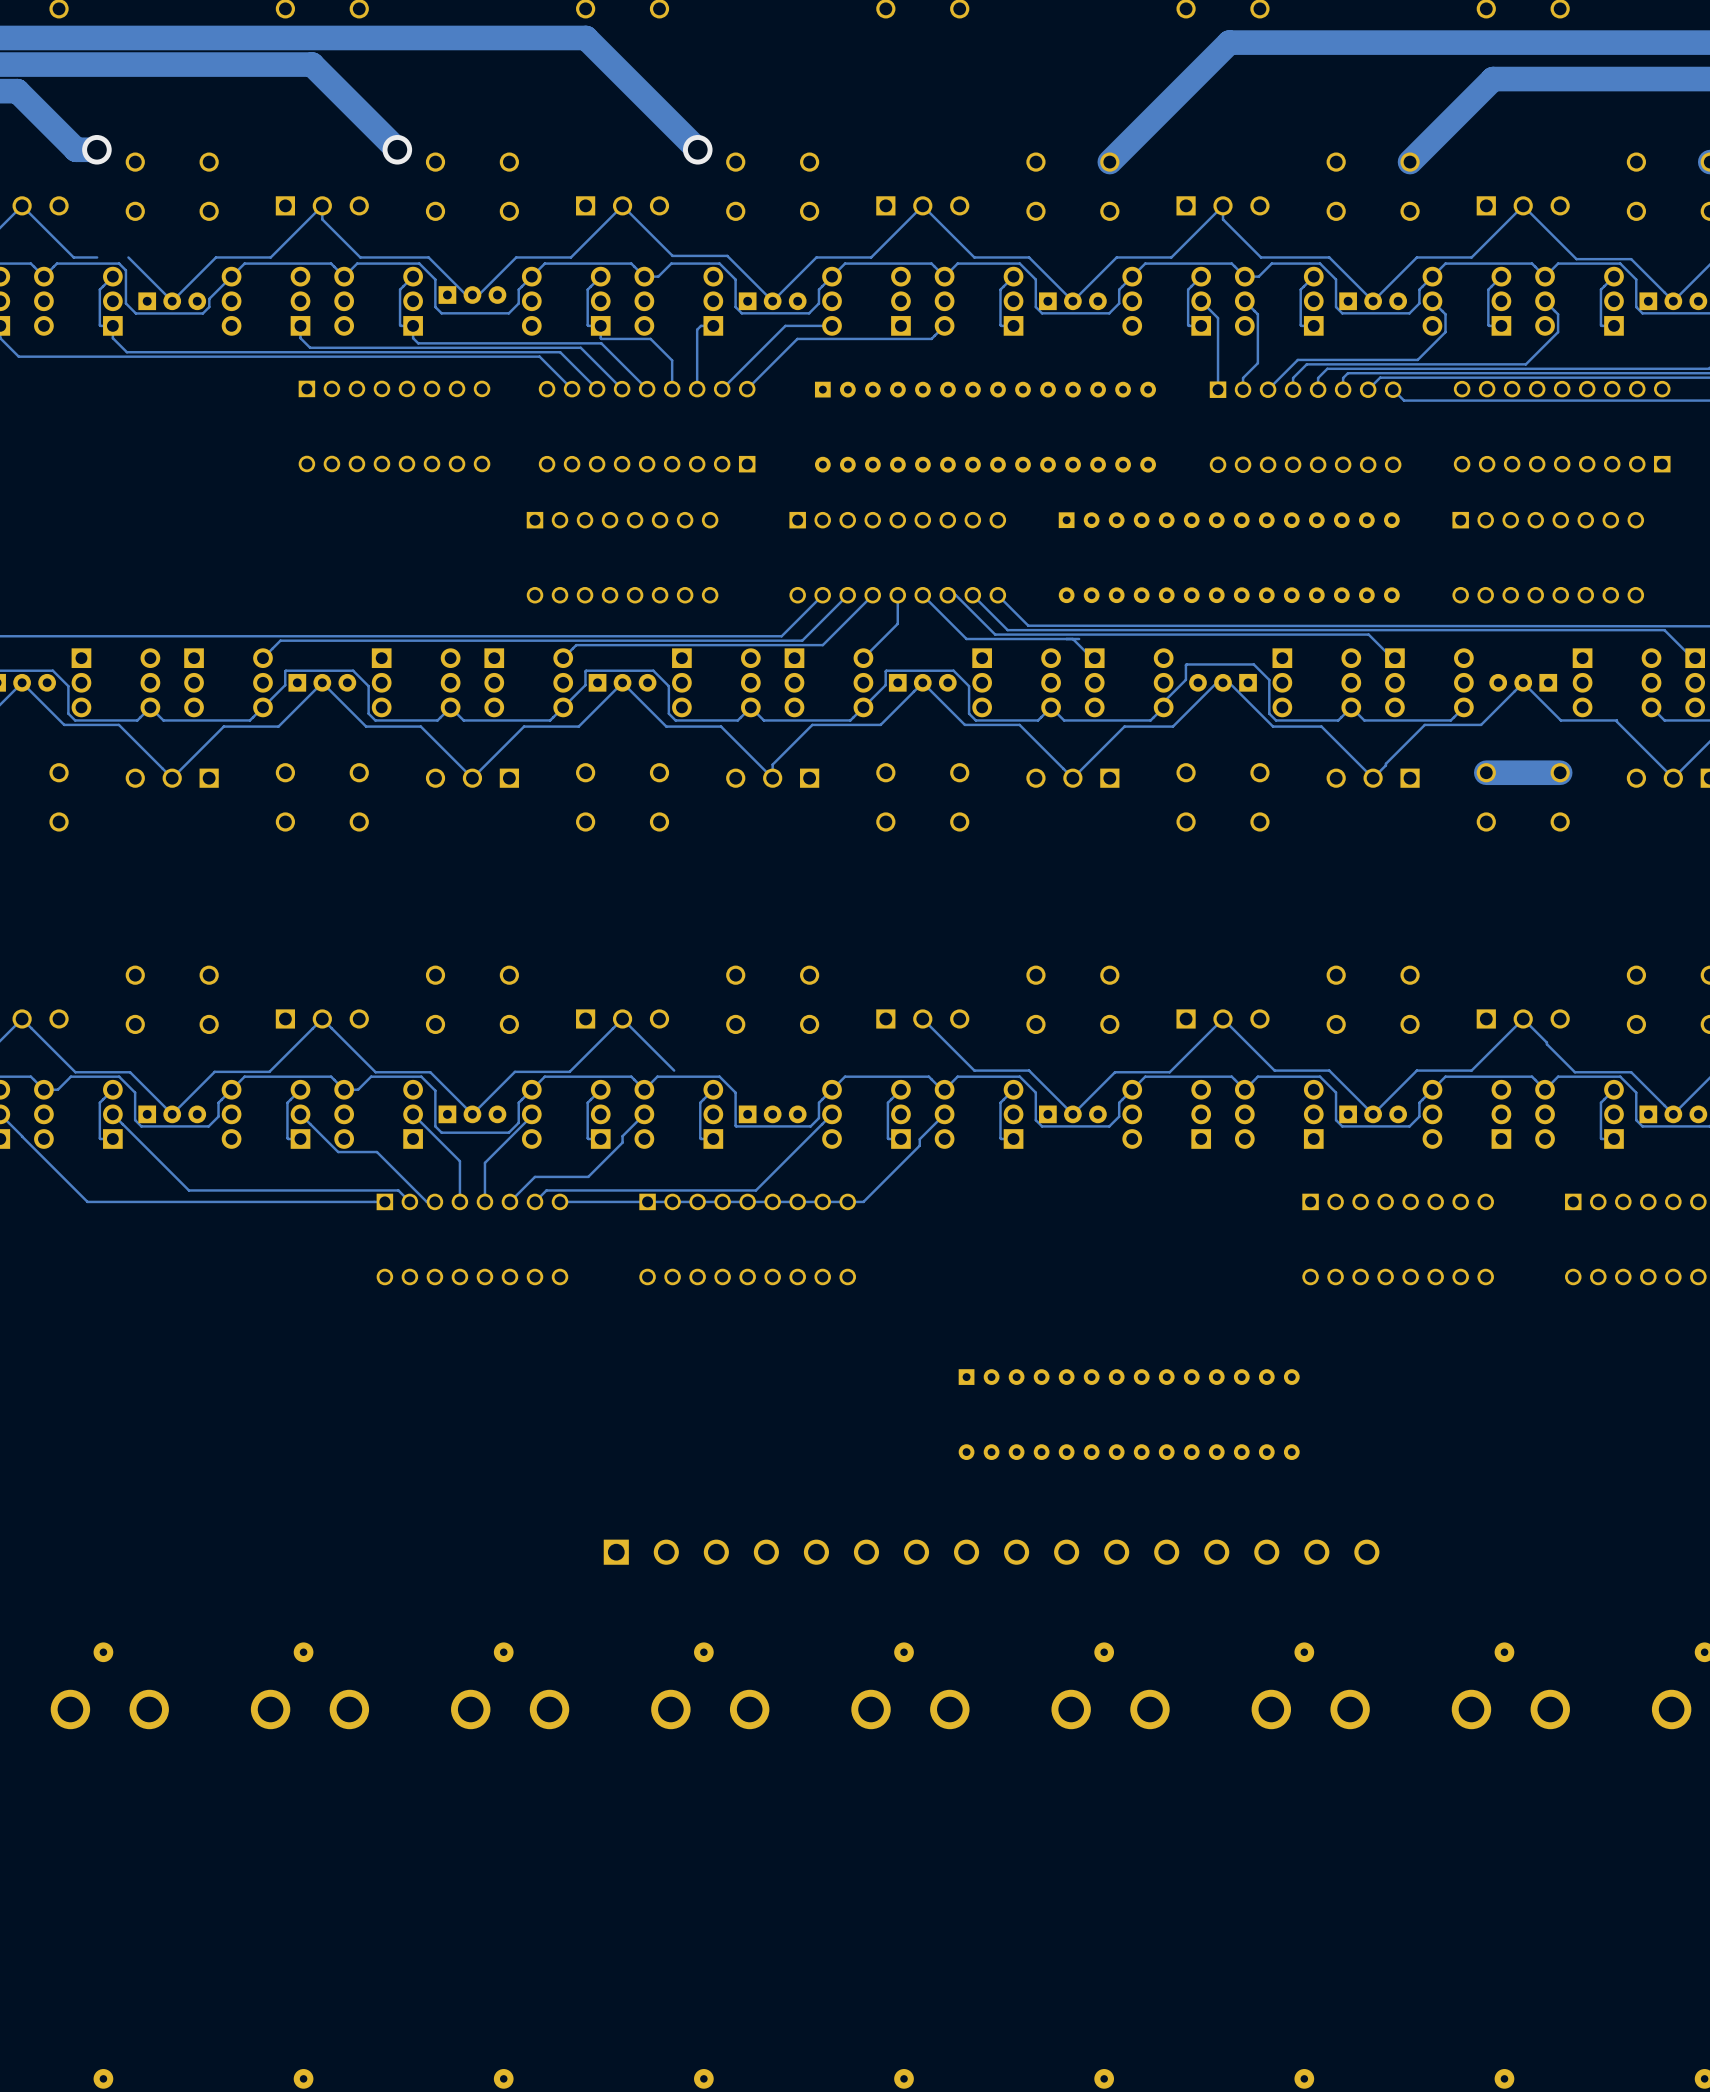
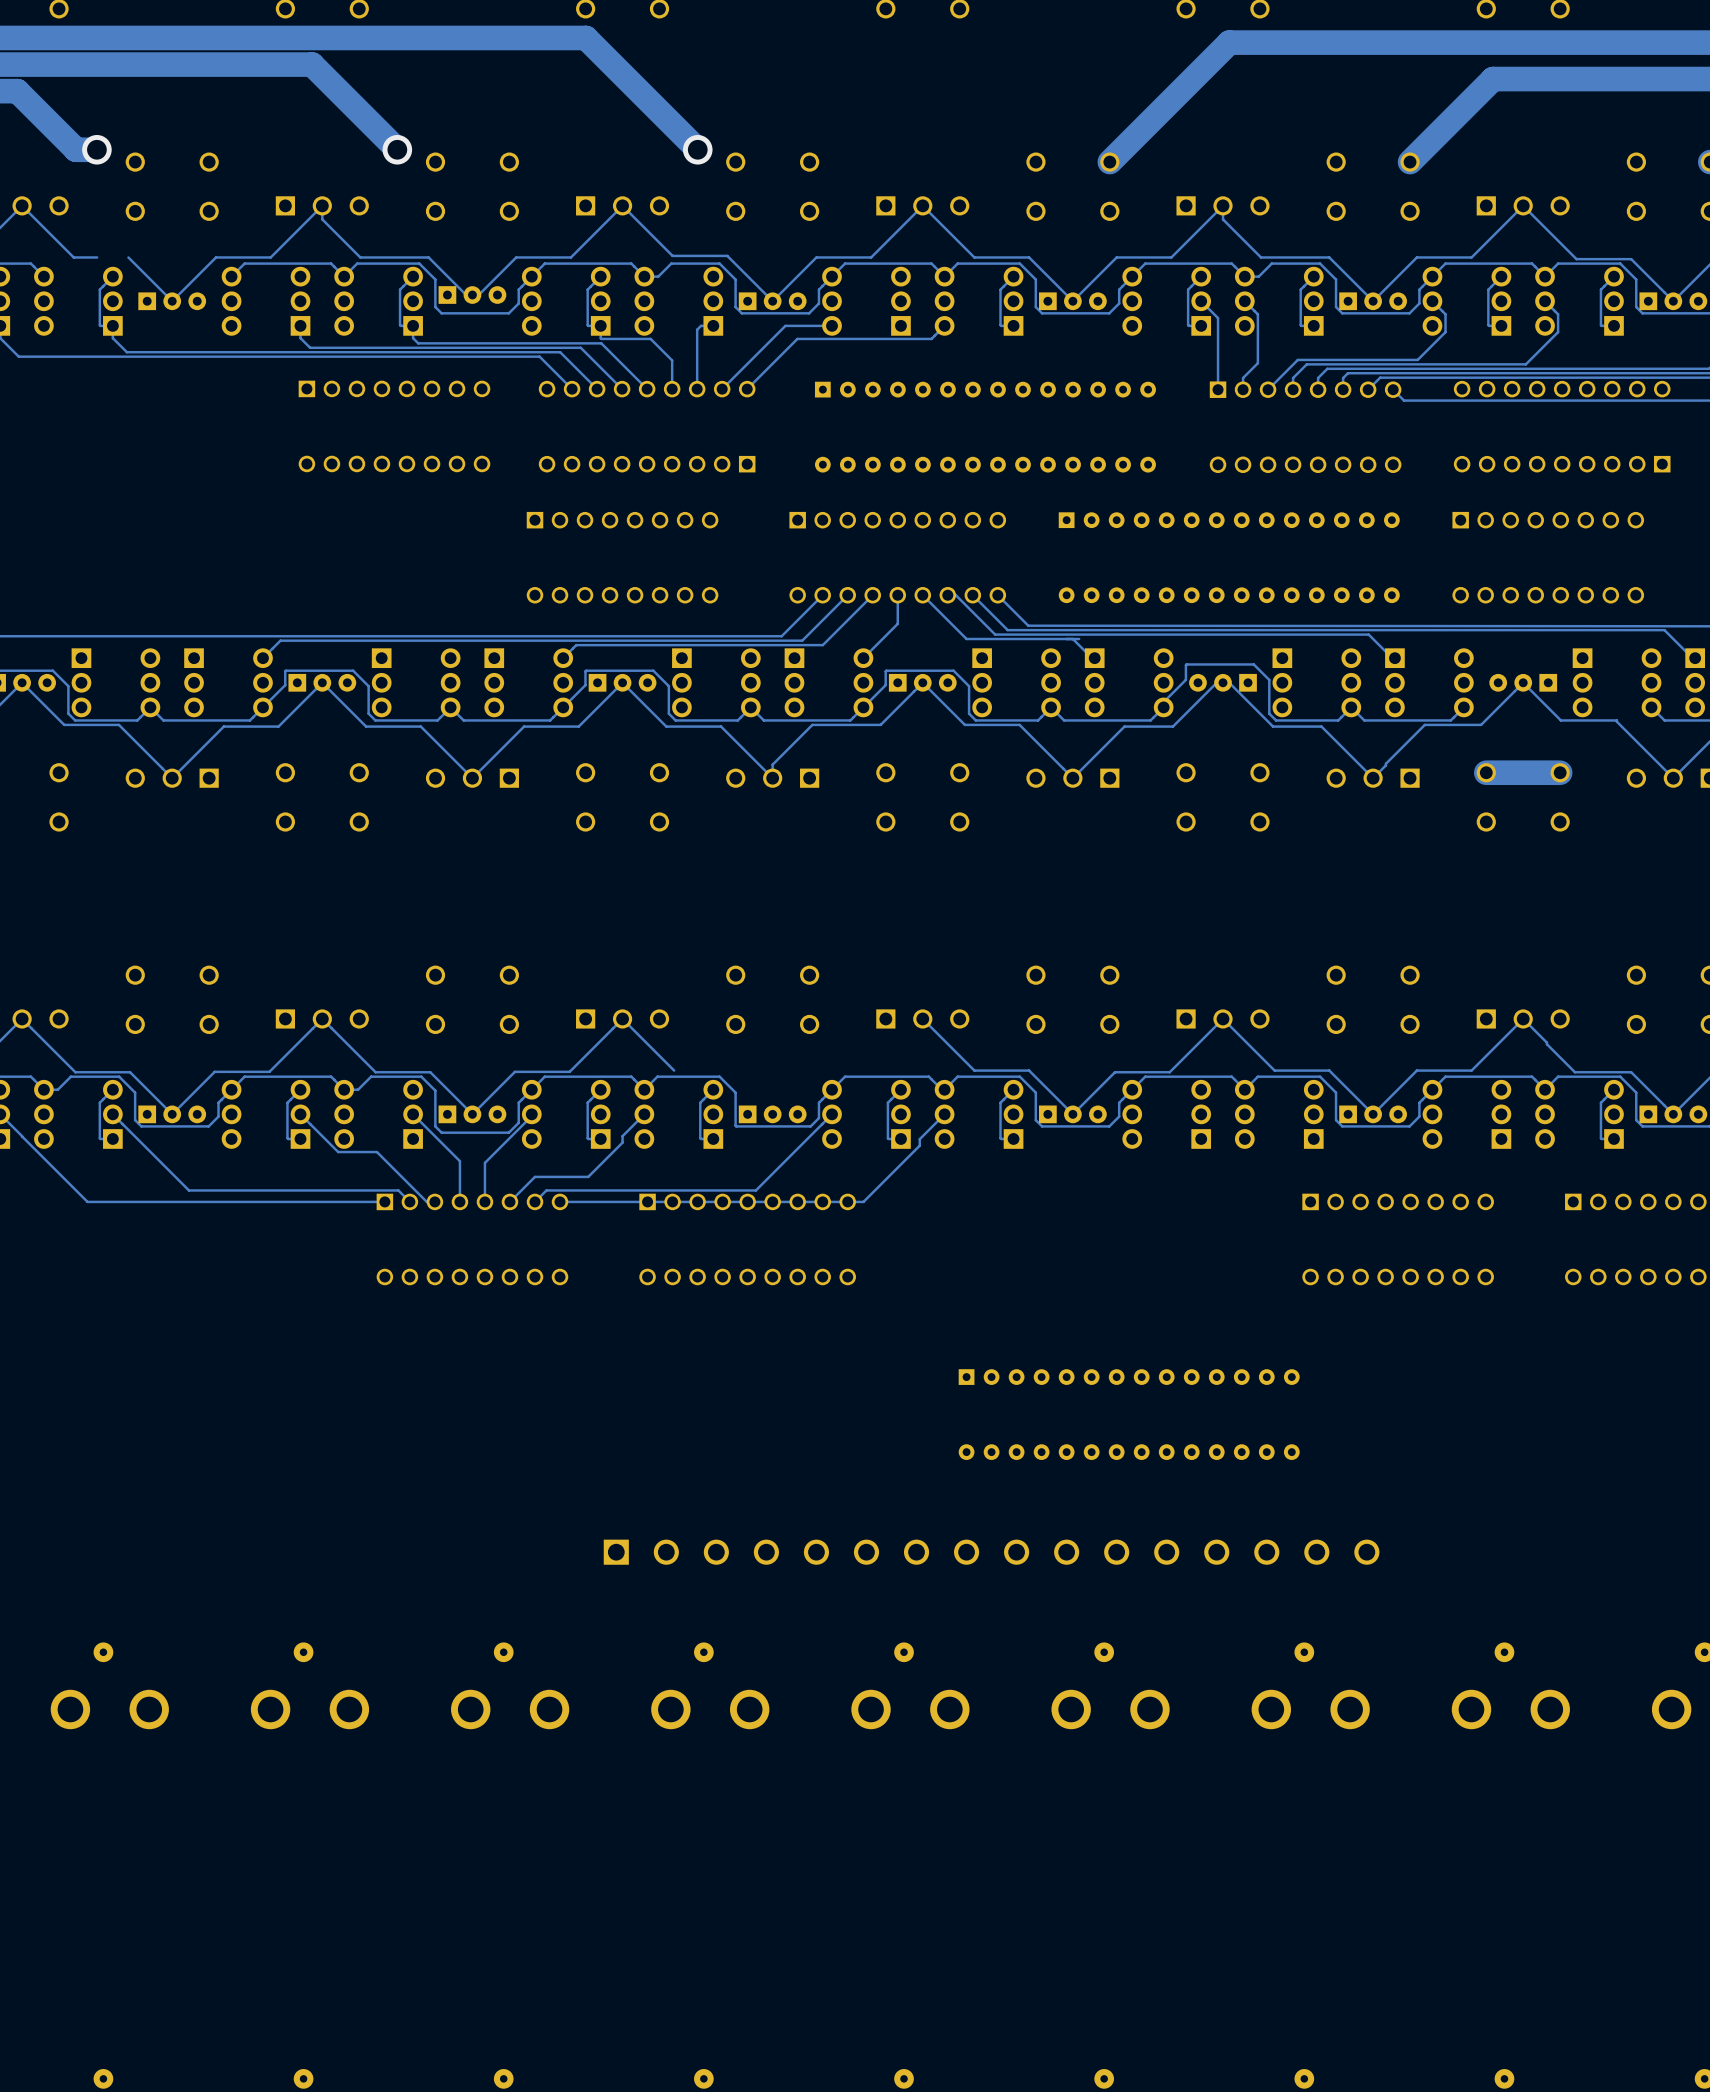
track: (231, 276) (209, 298) (209, 307) (202, 313) (135, 313) (125, 303) (125, 270) (119, 263) (56, 263) (43, 276) -> none

